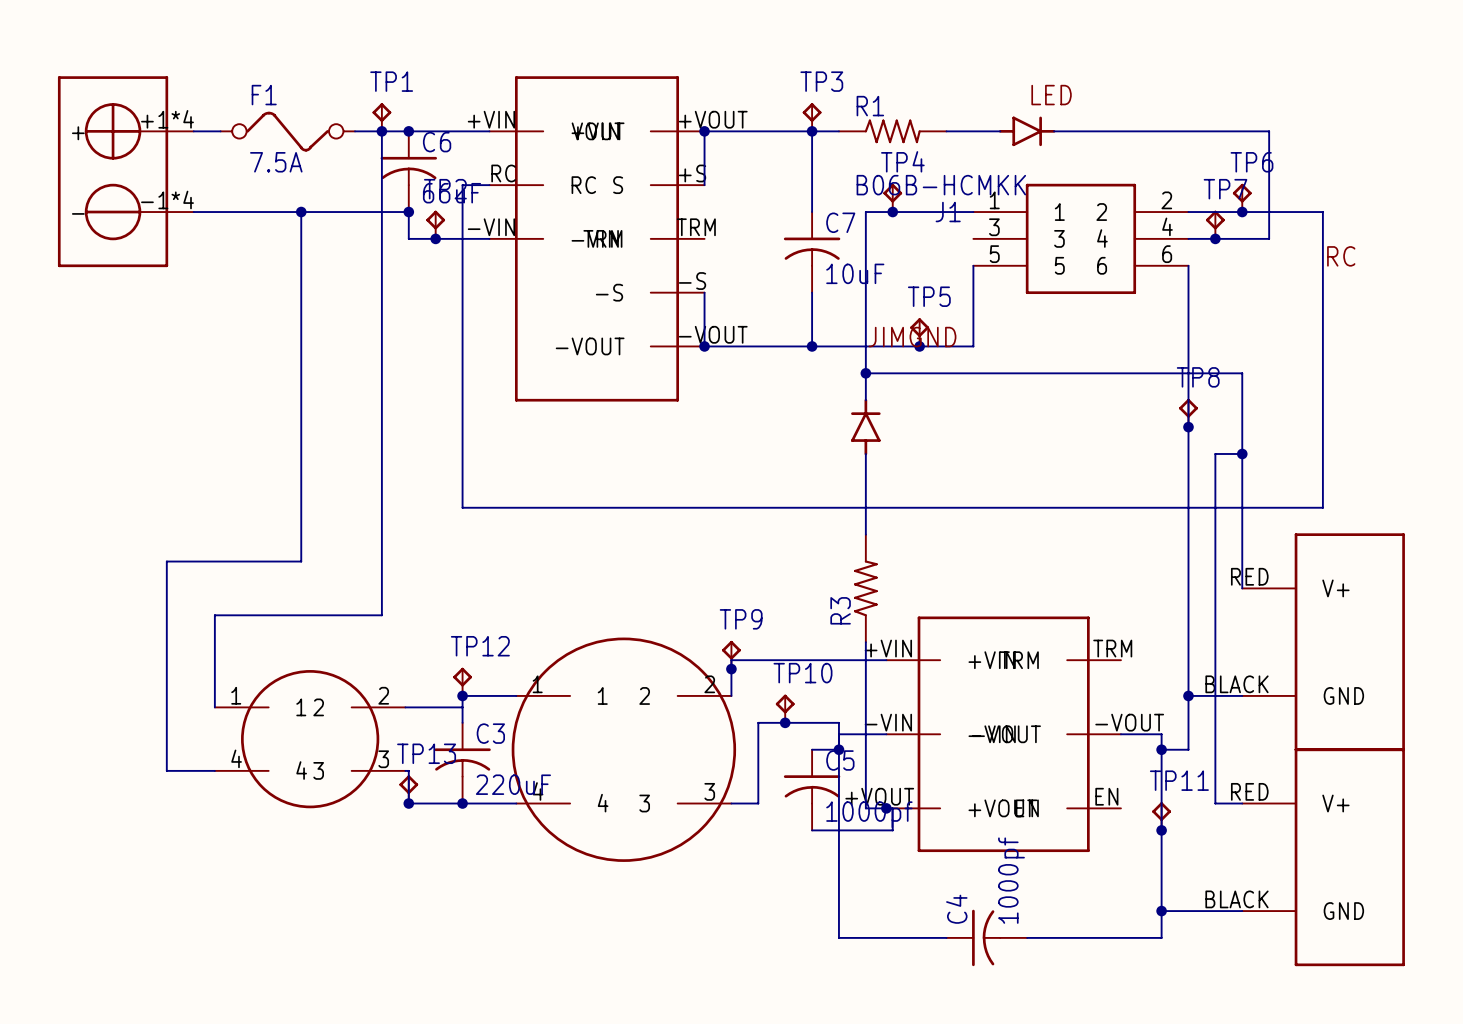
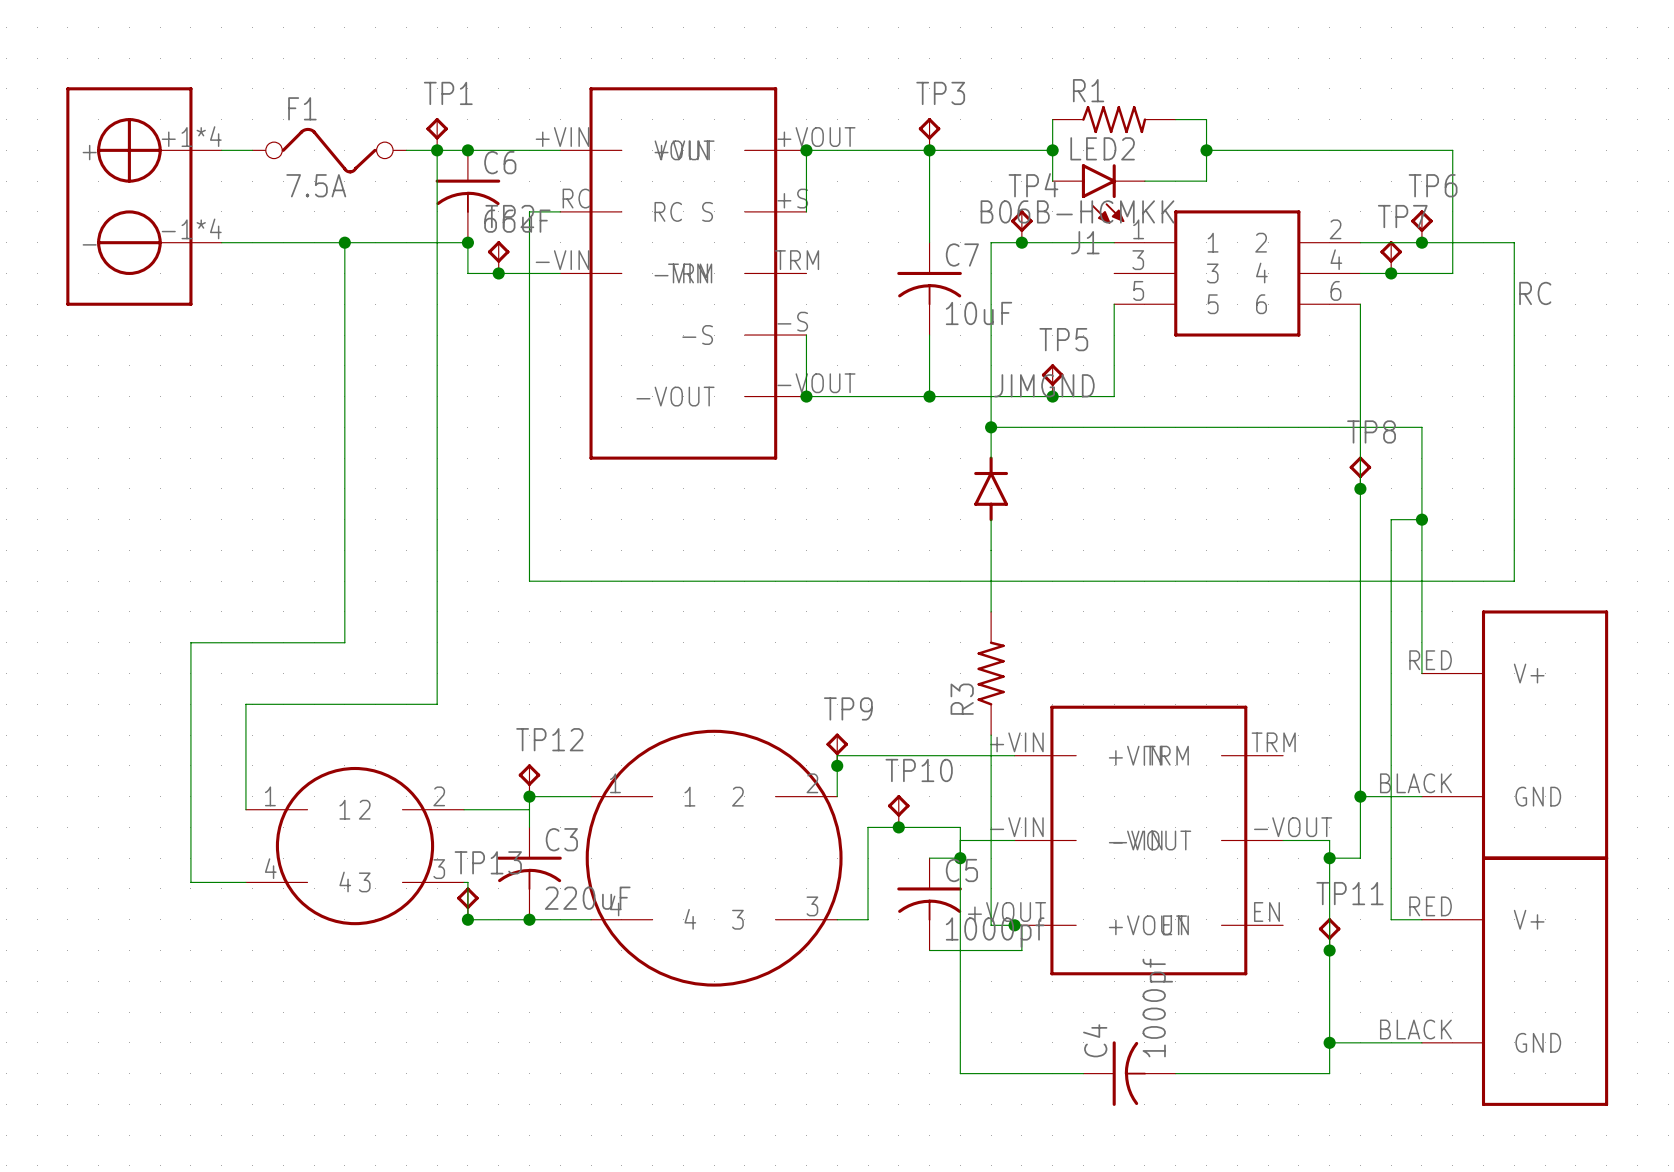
label: LED (1051, 95) -> none
wire: none -> (1052, 119) (1052, 181)
wire: none -> (1175, 119) (1206, 119) (1206, 181) (1144, 181)
R1 position: (892, 131) -> (1114, 119)
junction: none -> (1052, 150)
wire: (946, 131) (1000, 131) -> none
part: (1027, 131) -> none
junction: none -> (1206, 150)
LED2: none -> (1098, 193)

